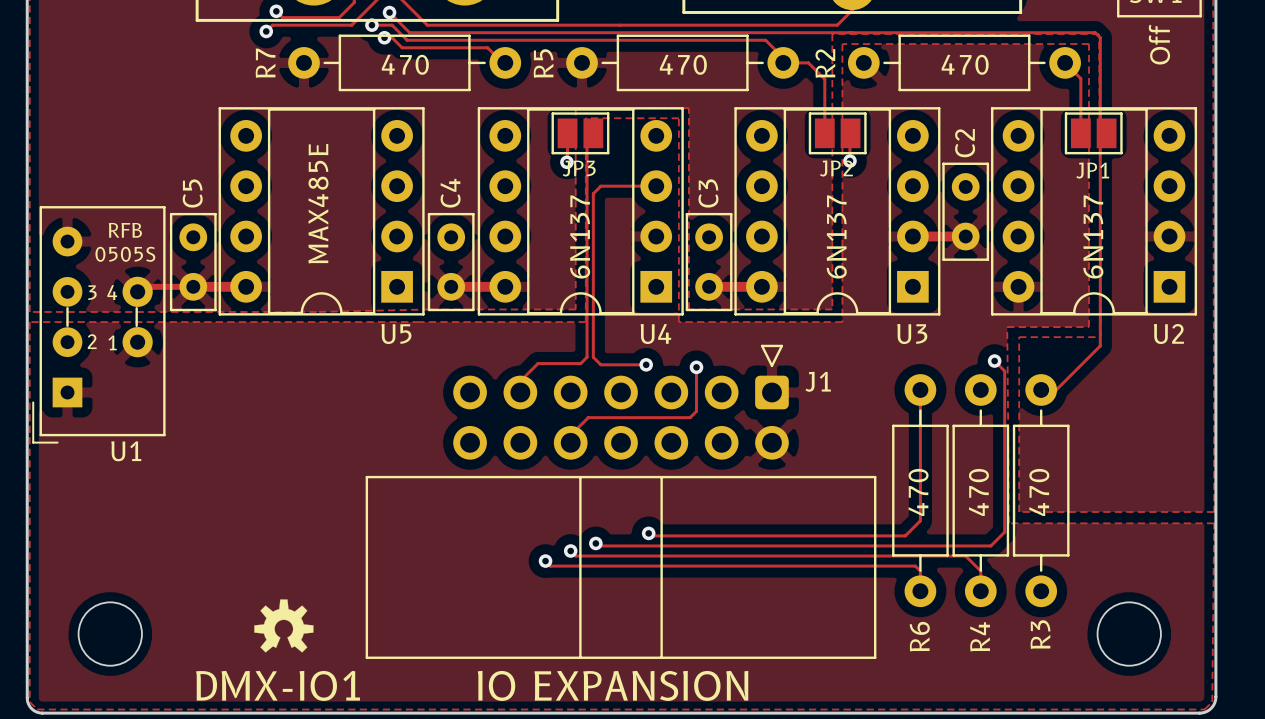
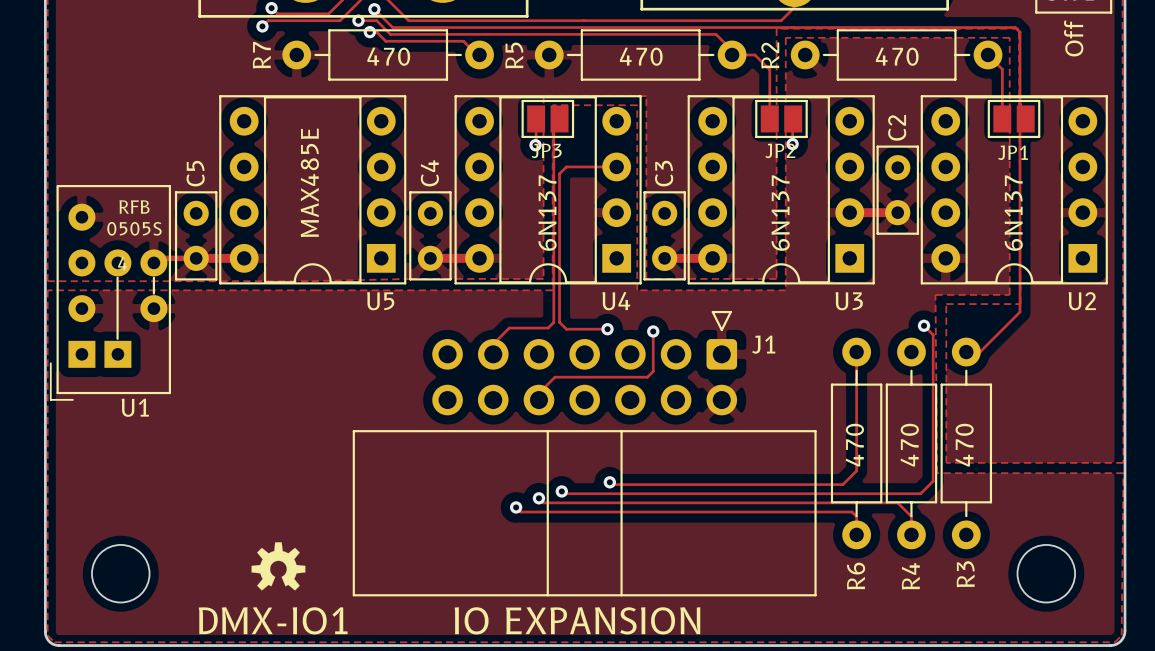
U1 footprint: [32, 206, 166, 444] -> [49, 185, 171, 401]
text: 3 (92, 292) -> none
text: 2 (92, 341) -> none
text: 1 (112, 342) -> none

